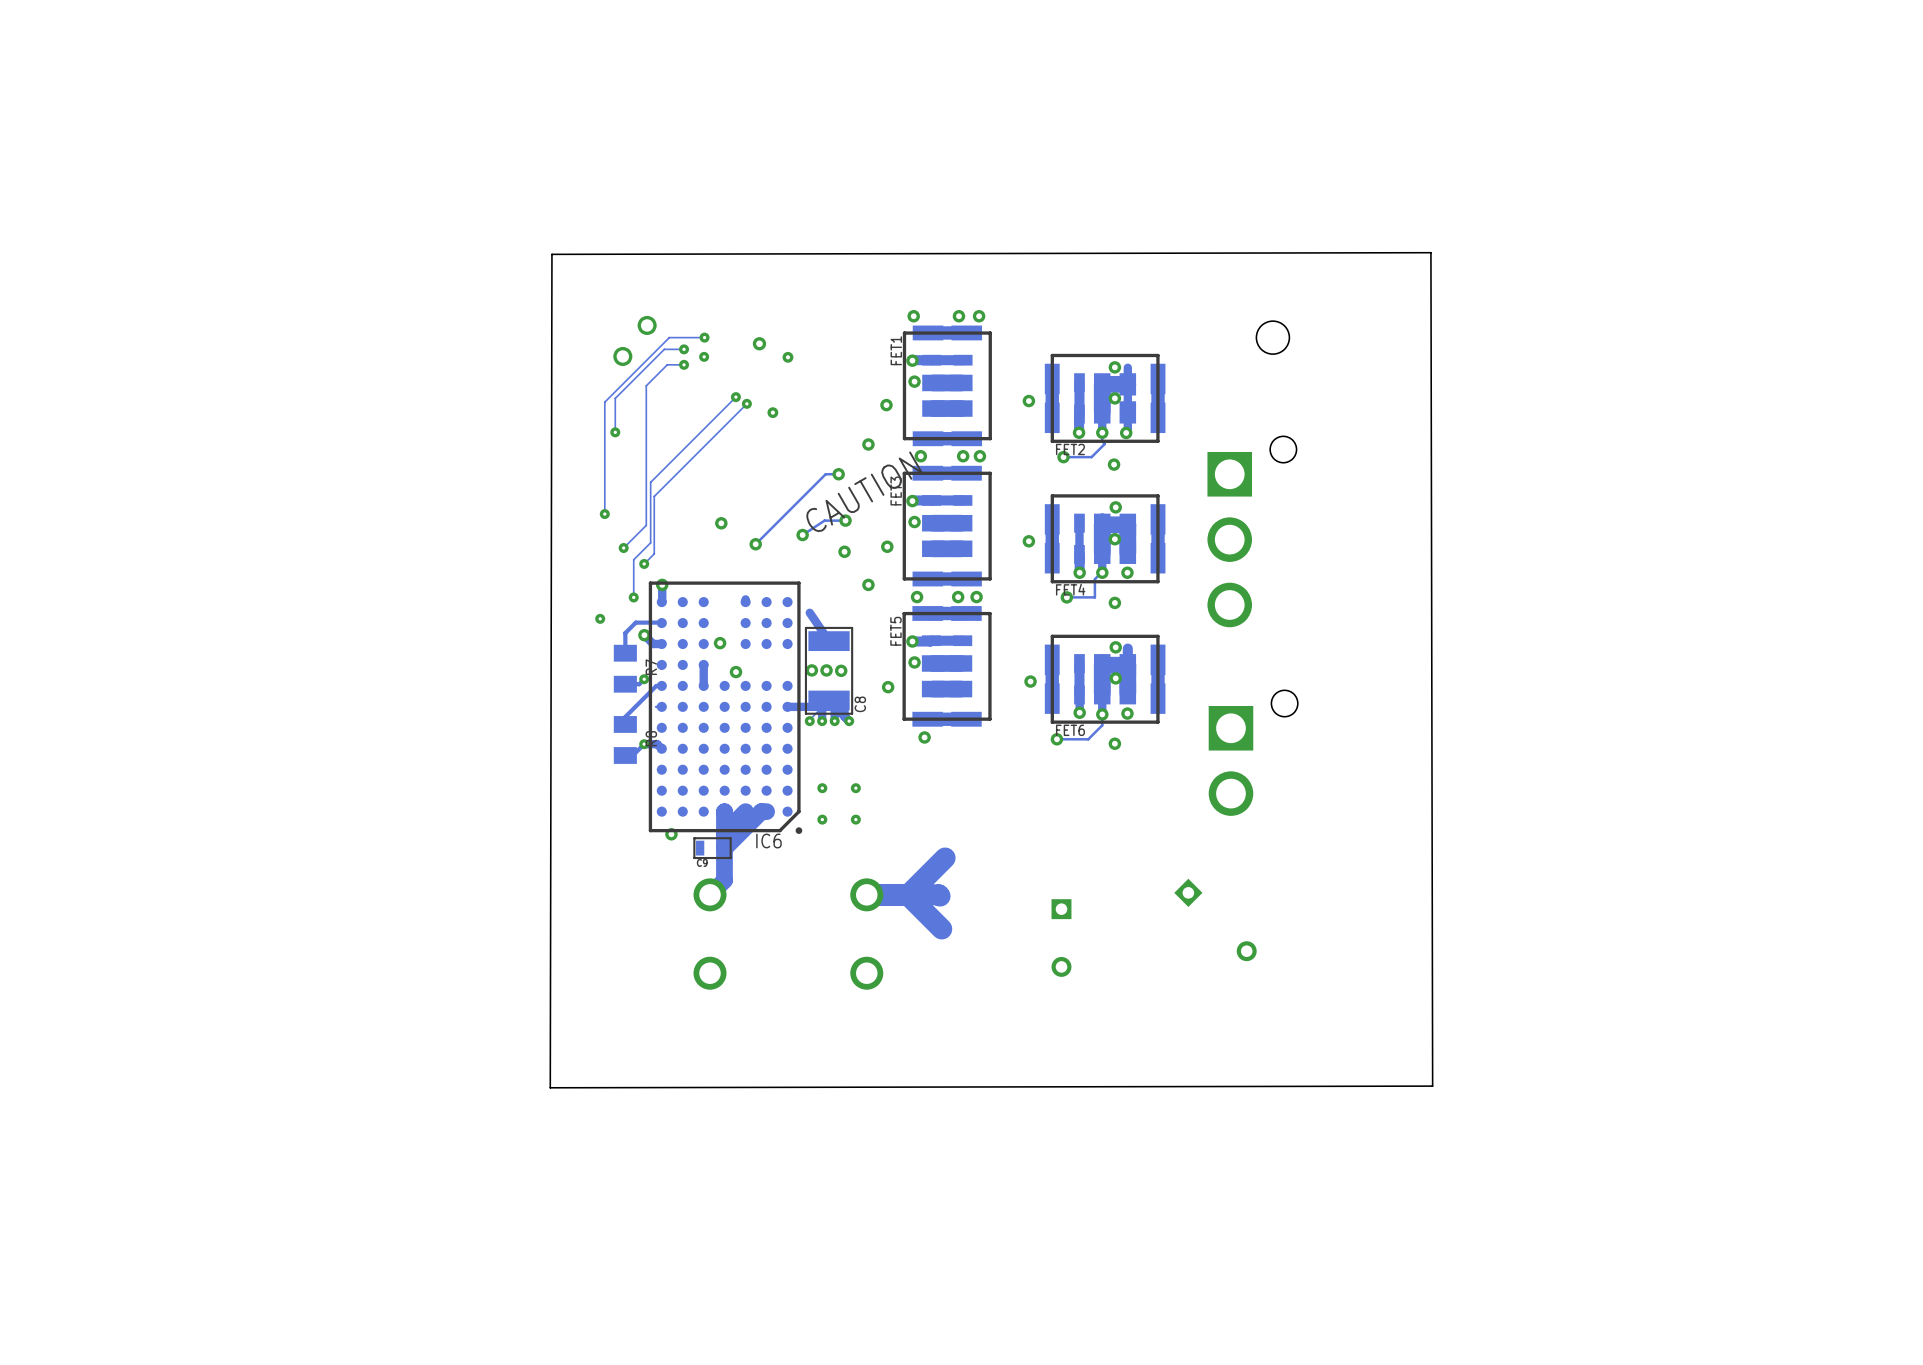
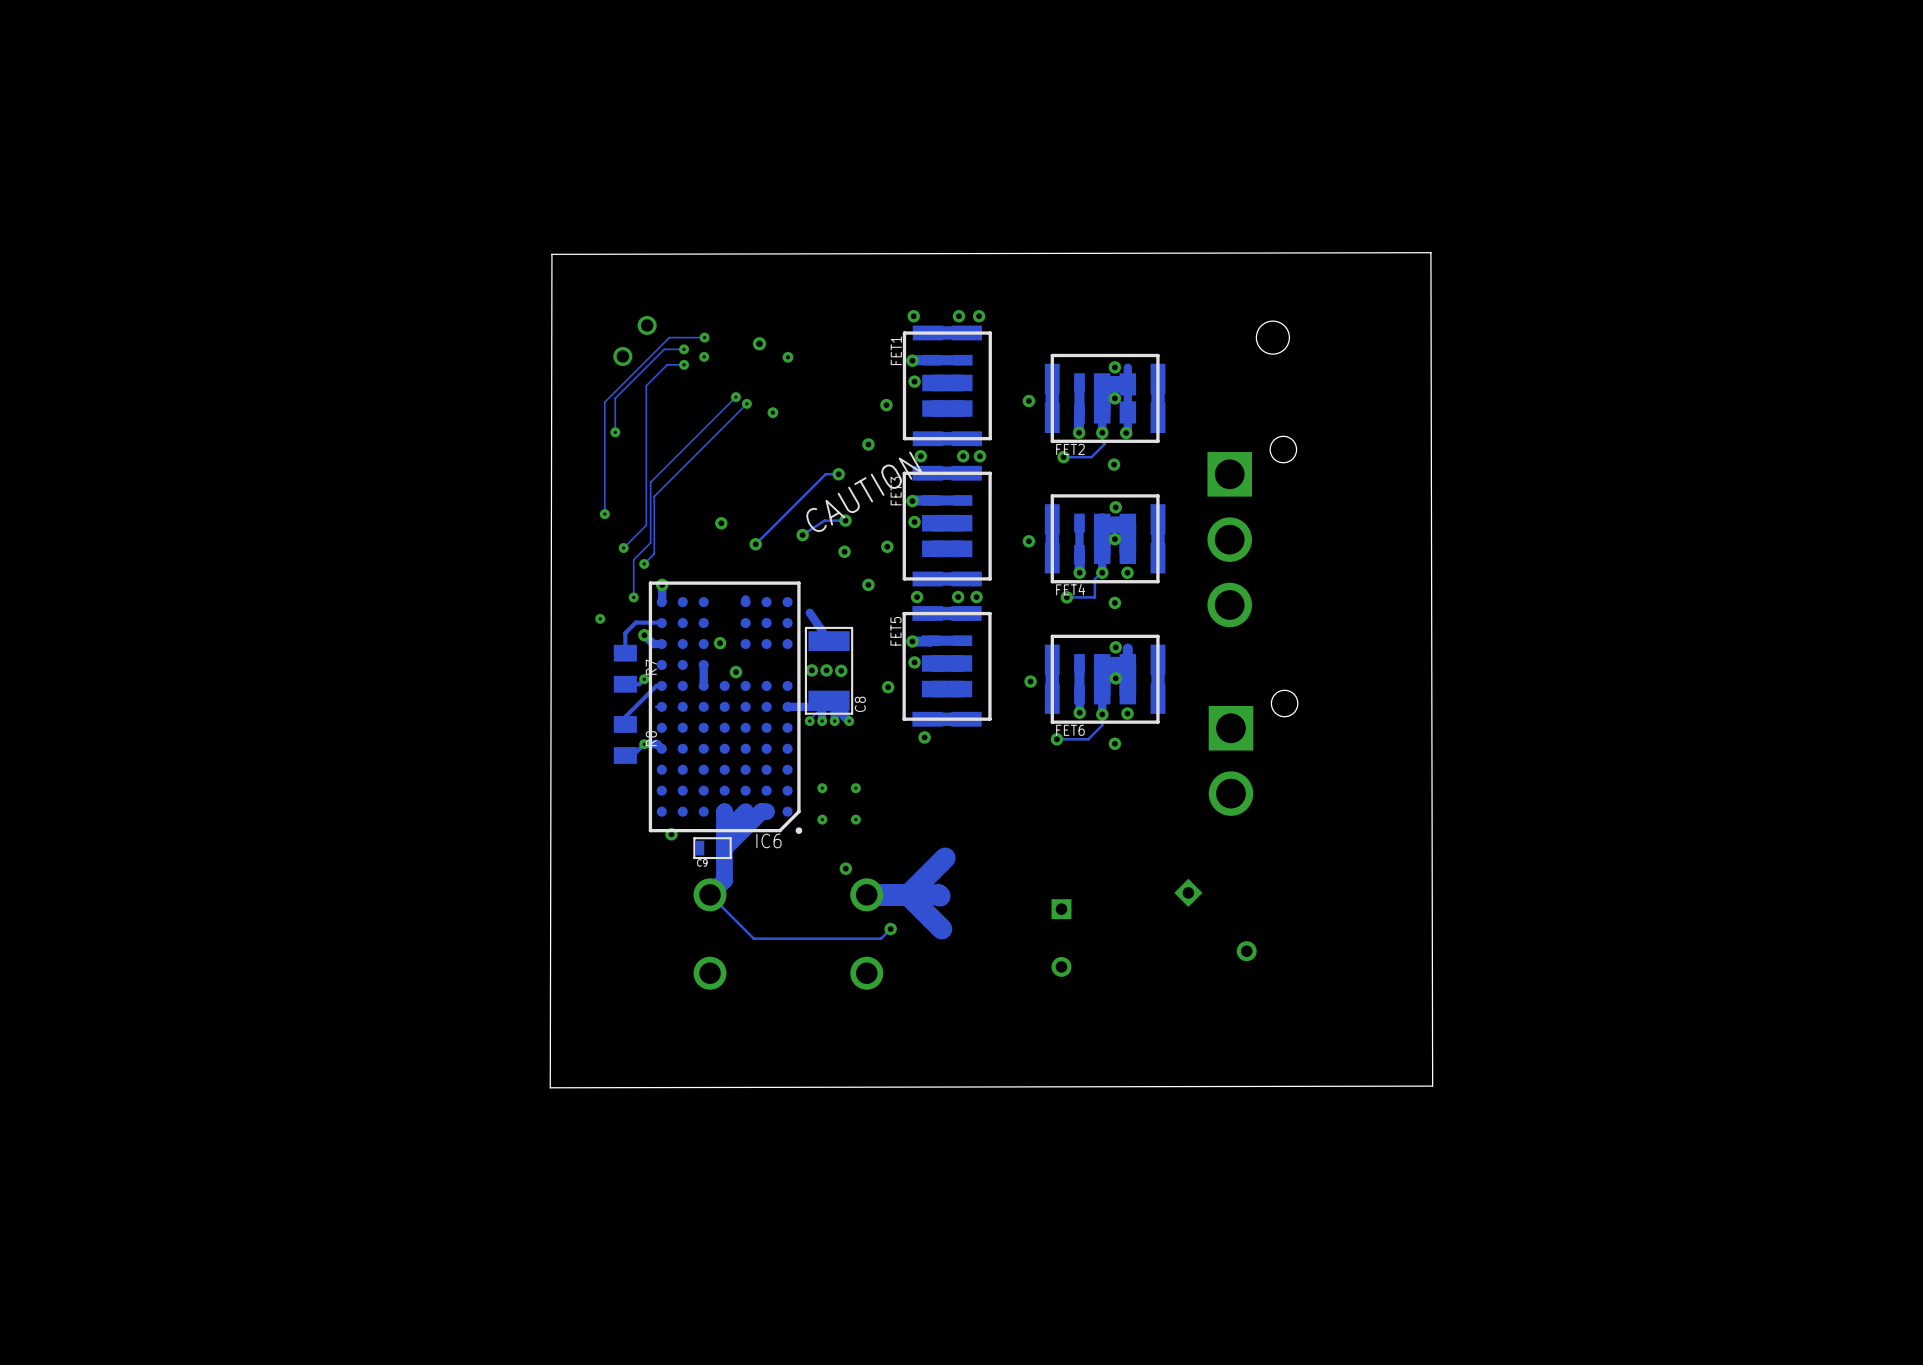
via: none -> (845, 868)
track: none -> (710, 894) (753, 938) (881, 938) (890, 929)
via: none -> (890, 929)

